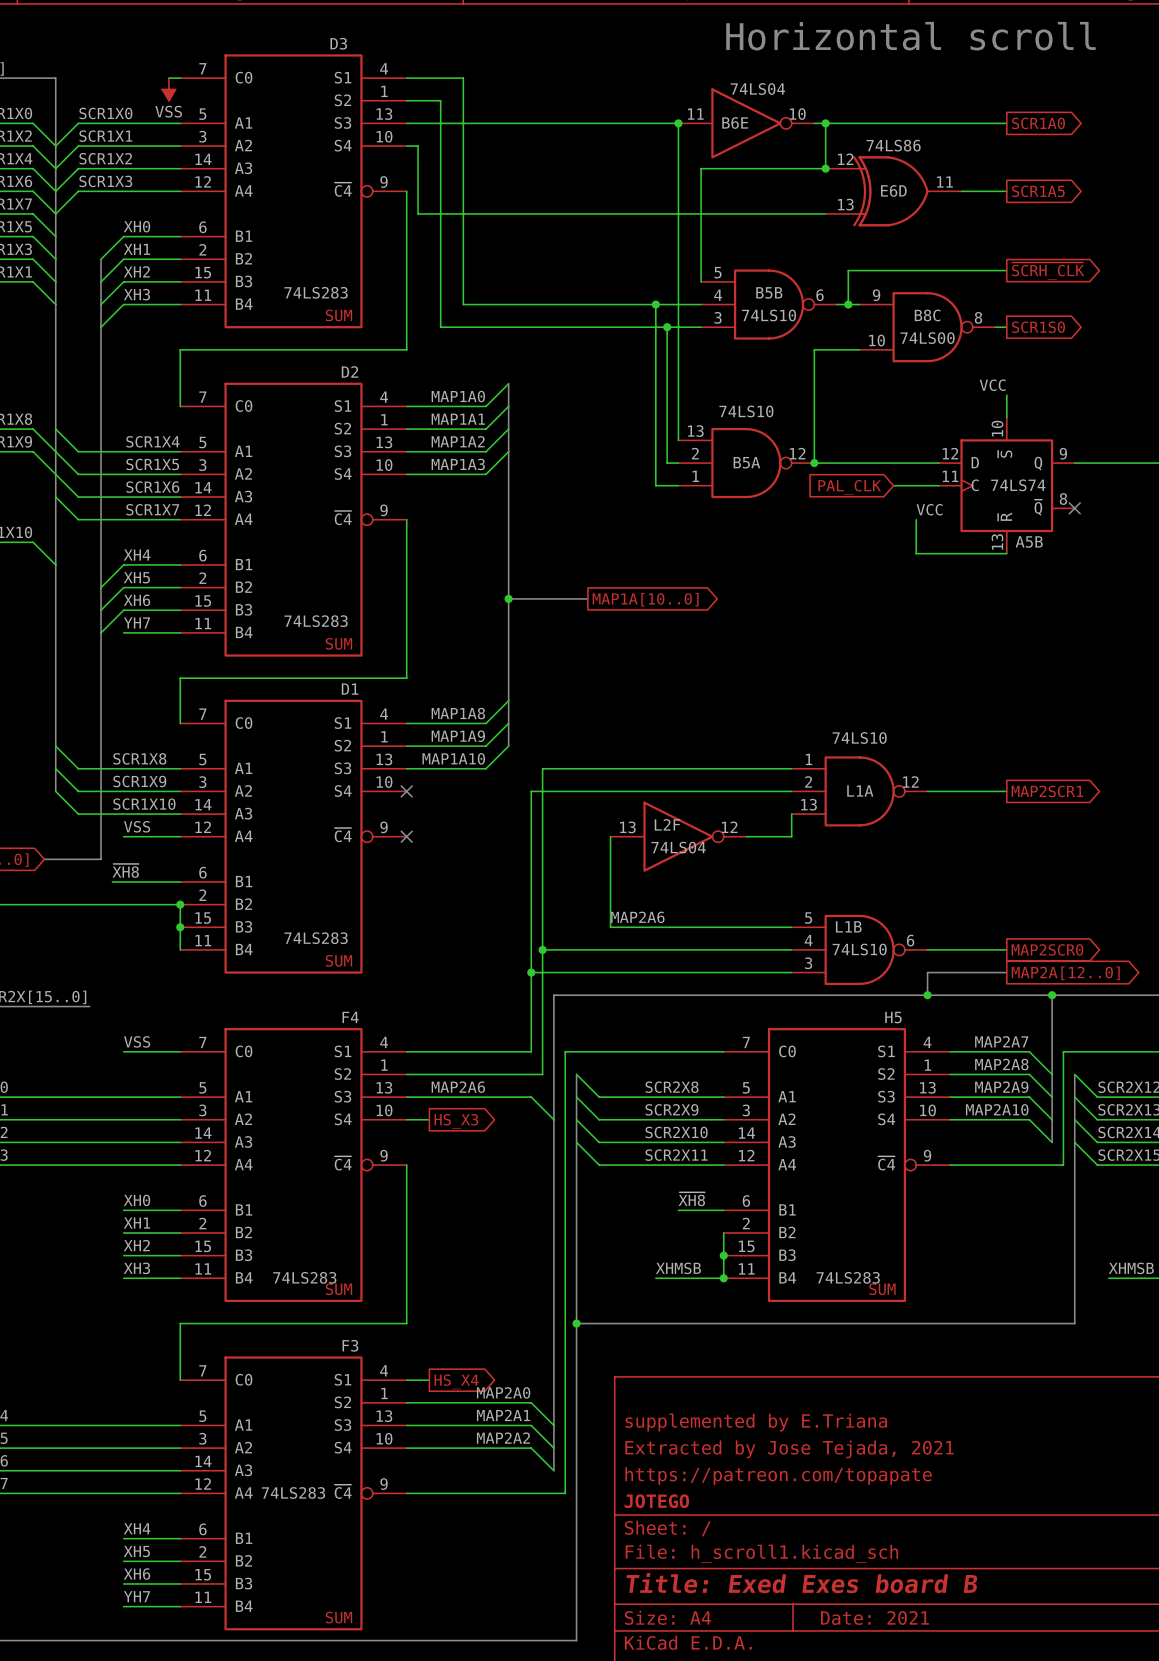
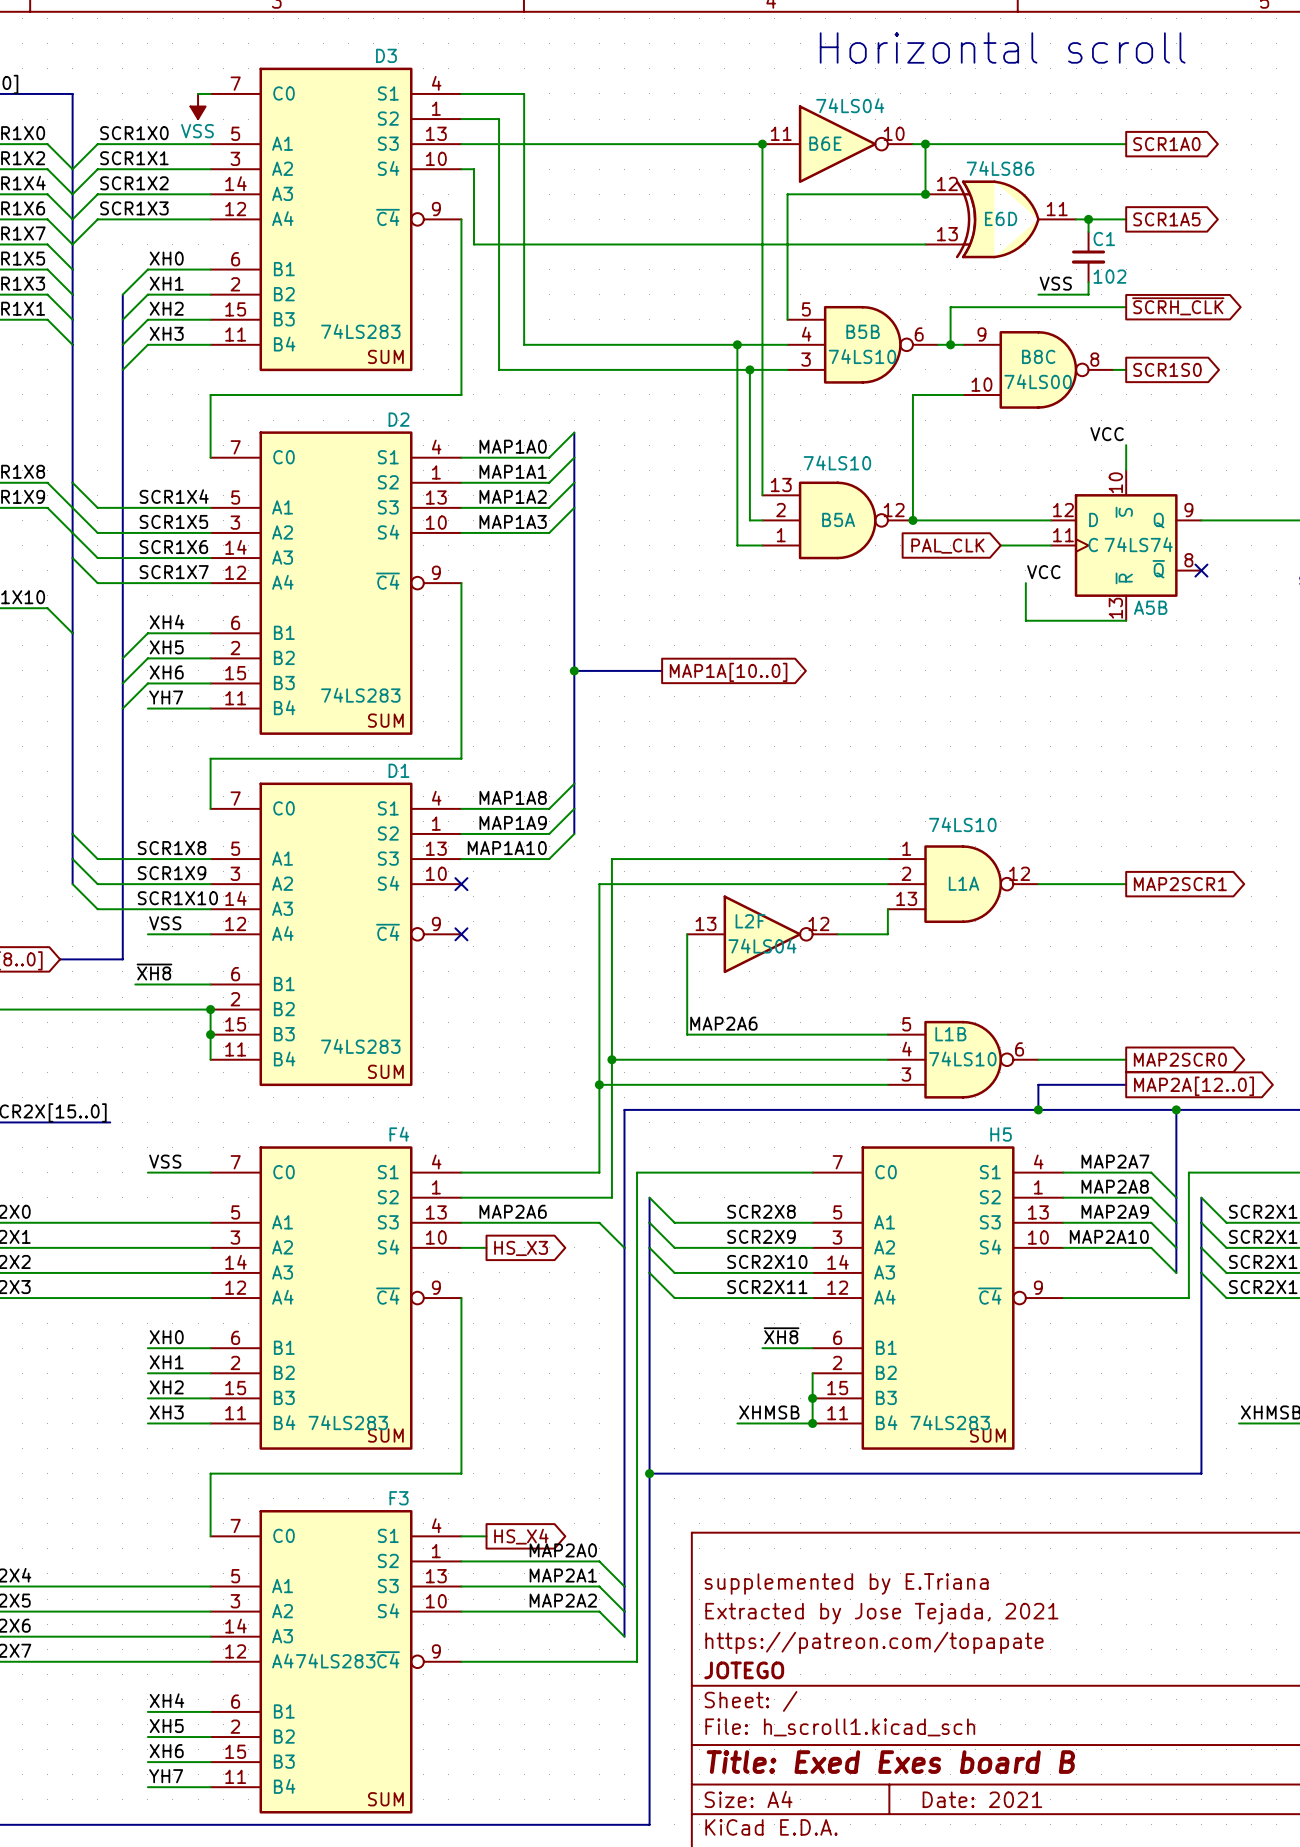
wire: none -> (1088, 219) (1088, 231)
junction: none -> (1088, 219)
C1: none -> 102 (1088, 257)
wire: none -> (1088, 282) (1088, 294) (1038, 294)
label: none -> VSS (1055, 283)

